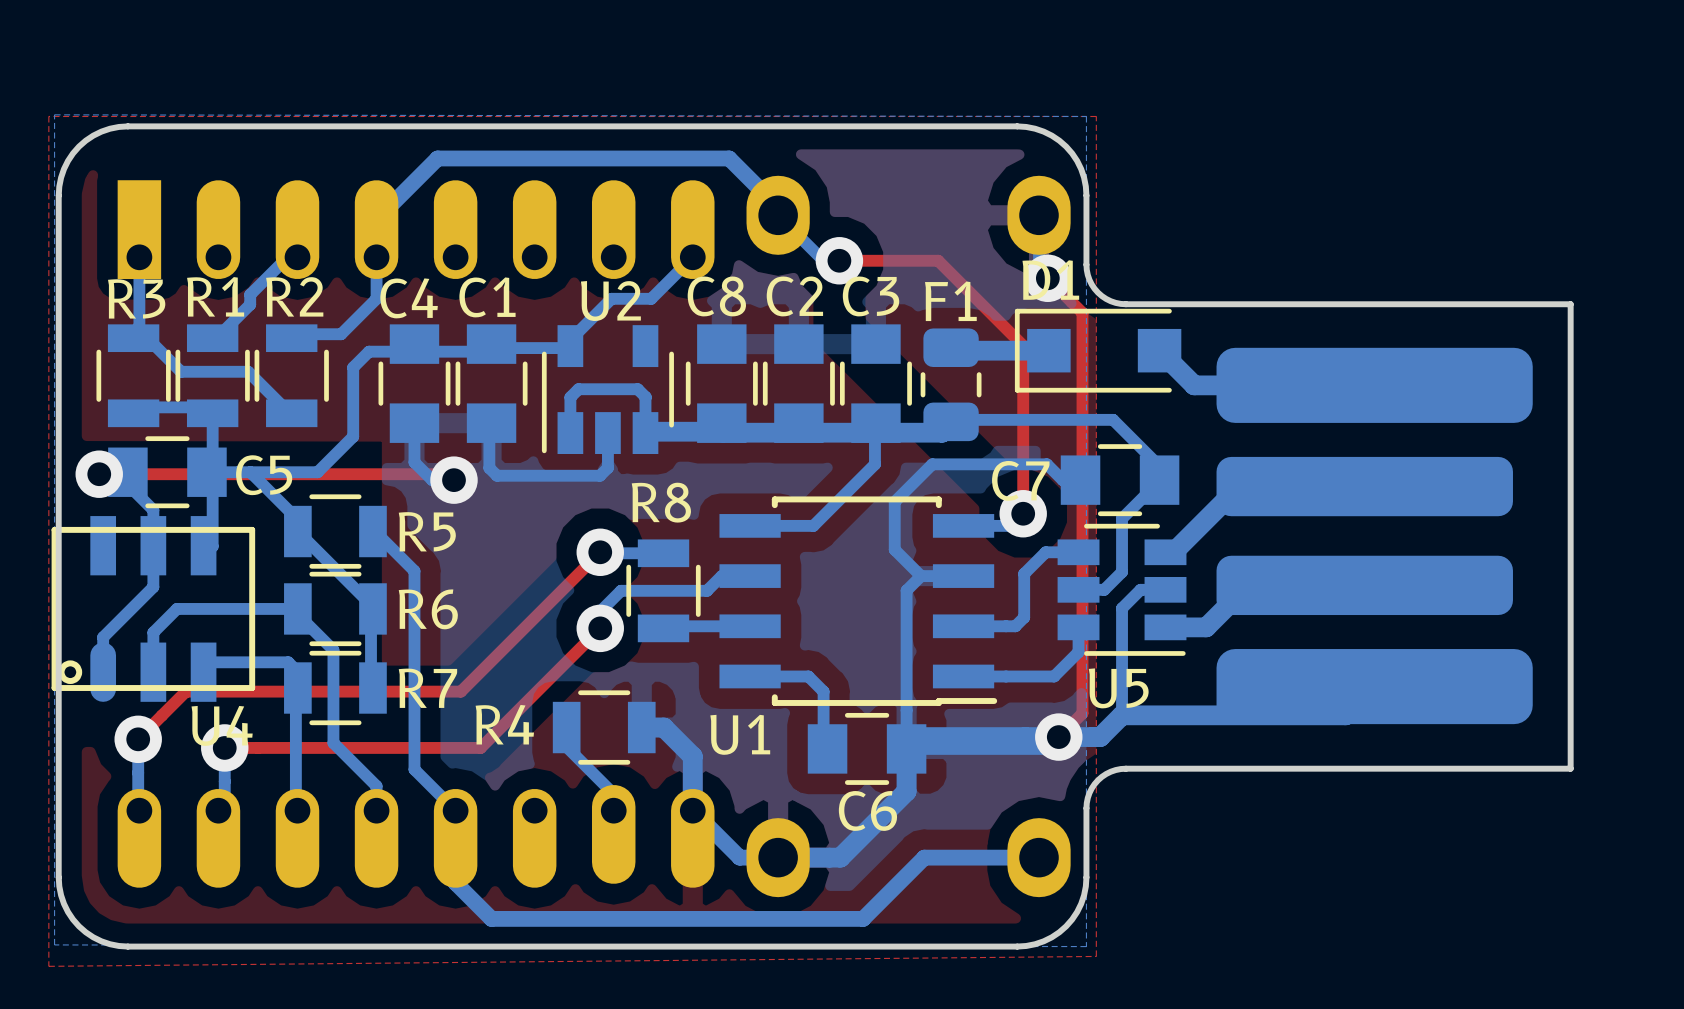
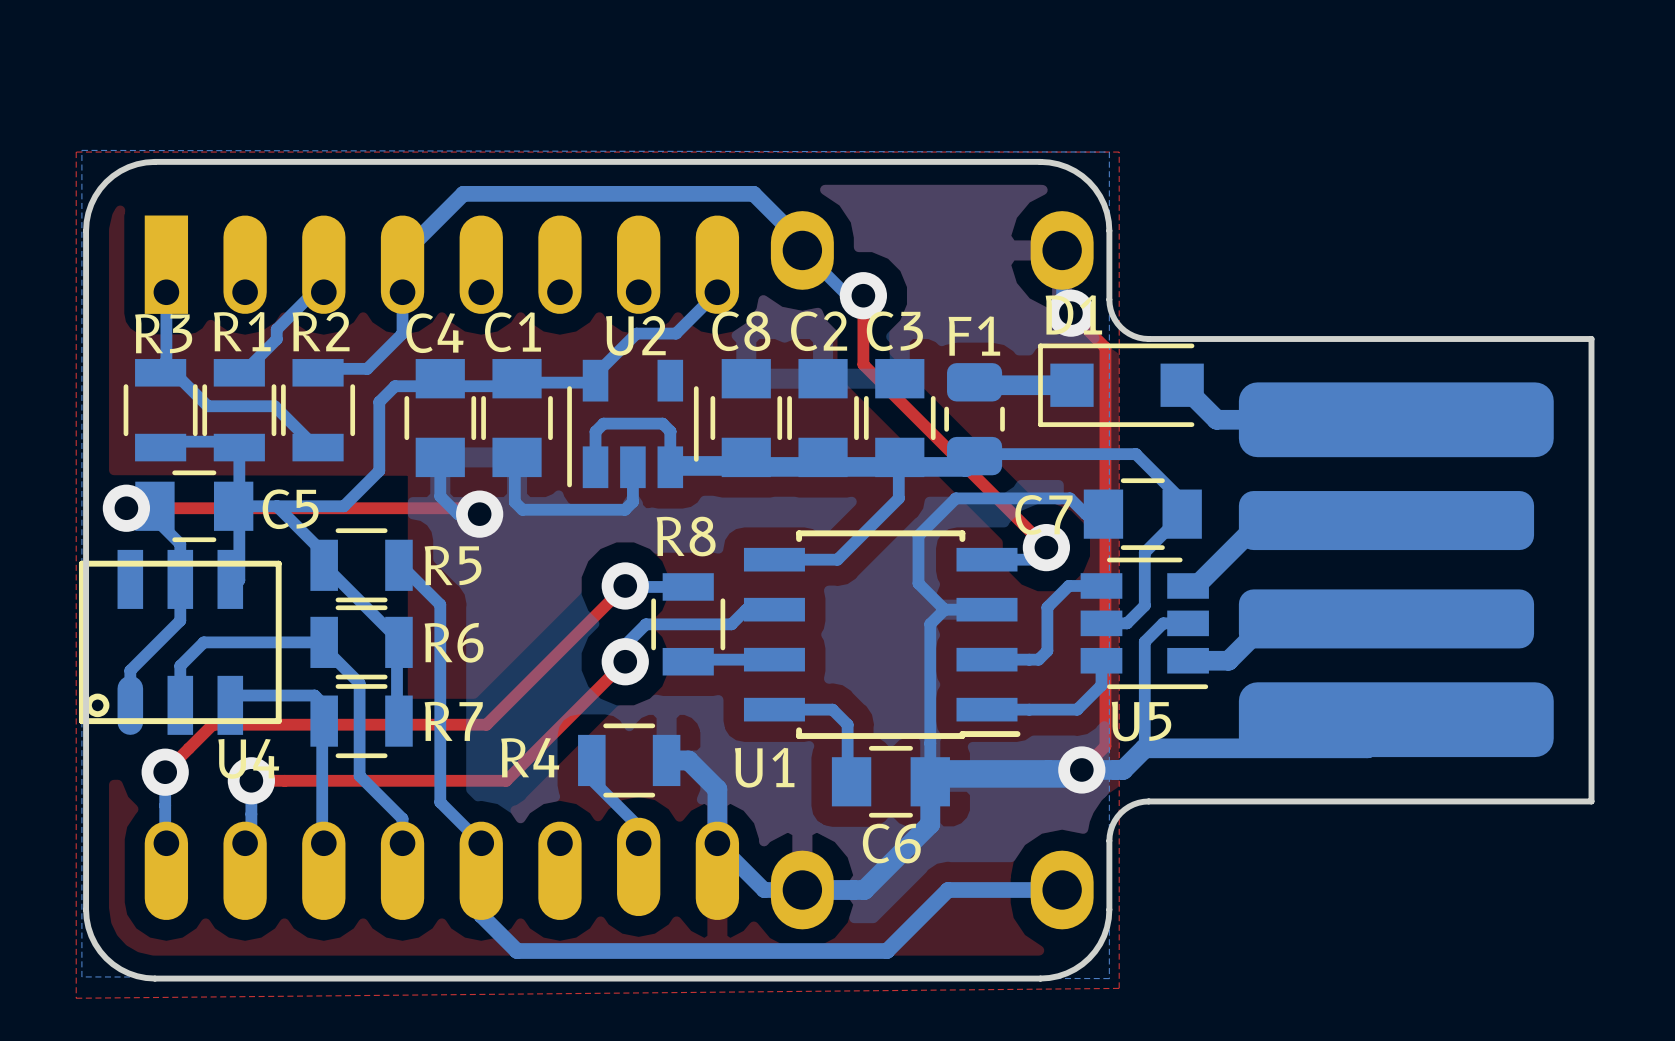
top track: (839, 260) (938, 260) (1023, 345) (1023, 513) -> (863, 295) (863, 364) (1046, 547)

